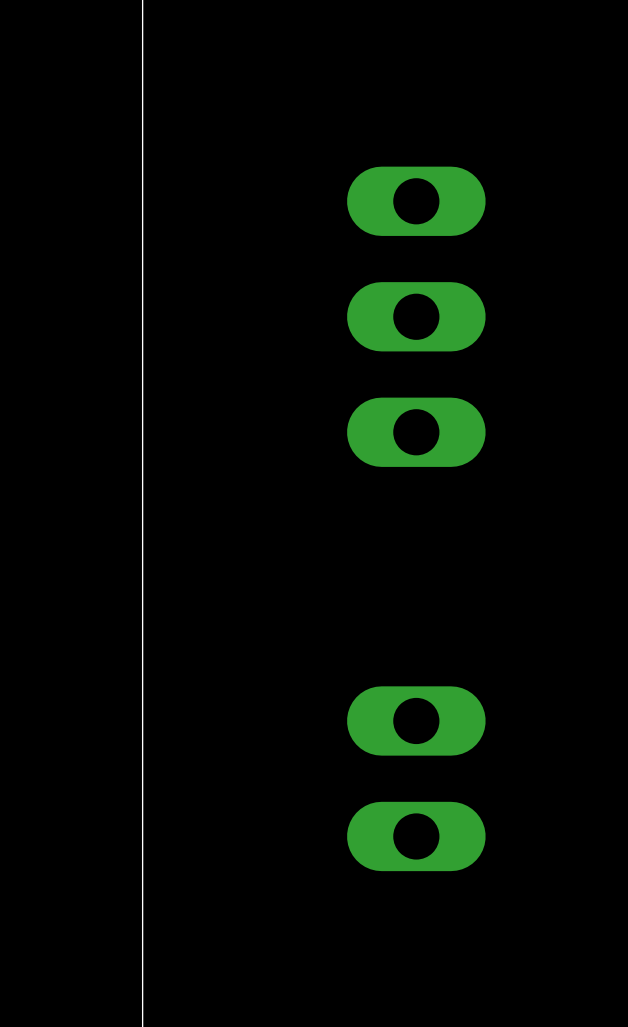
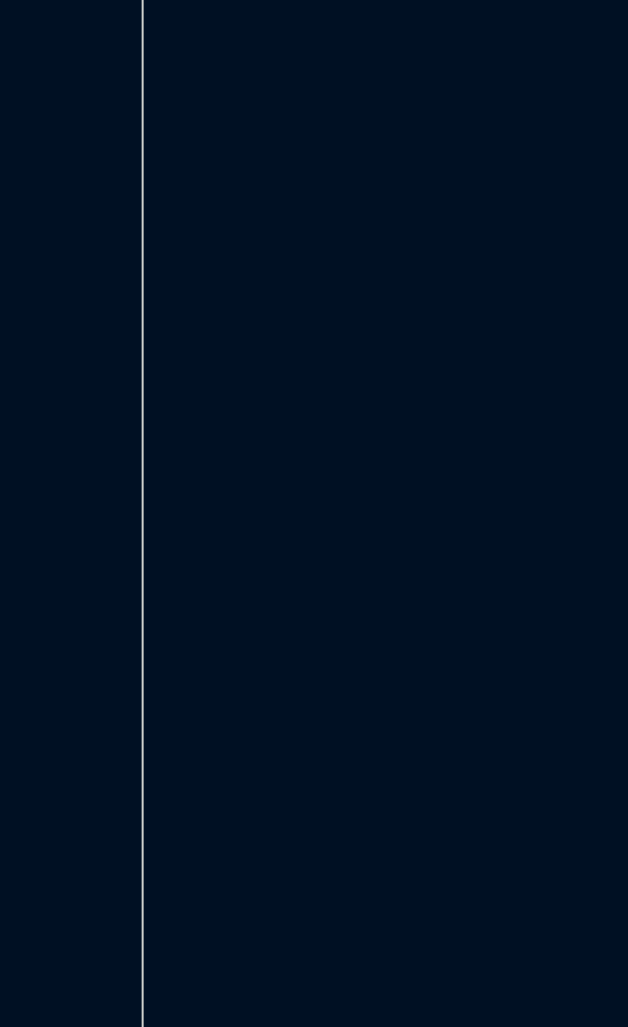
part: (416, 316) -> none
part: (416, 778) -> none

